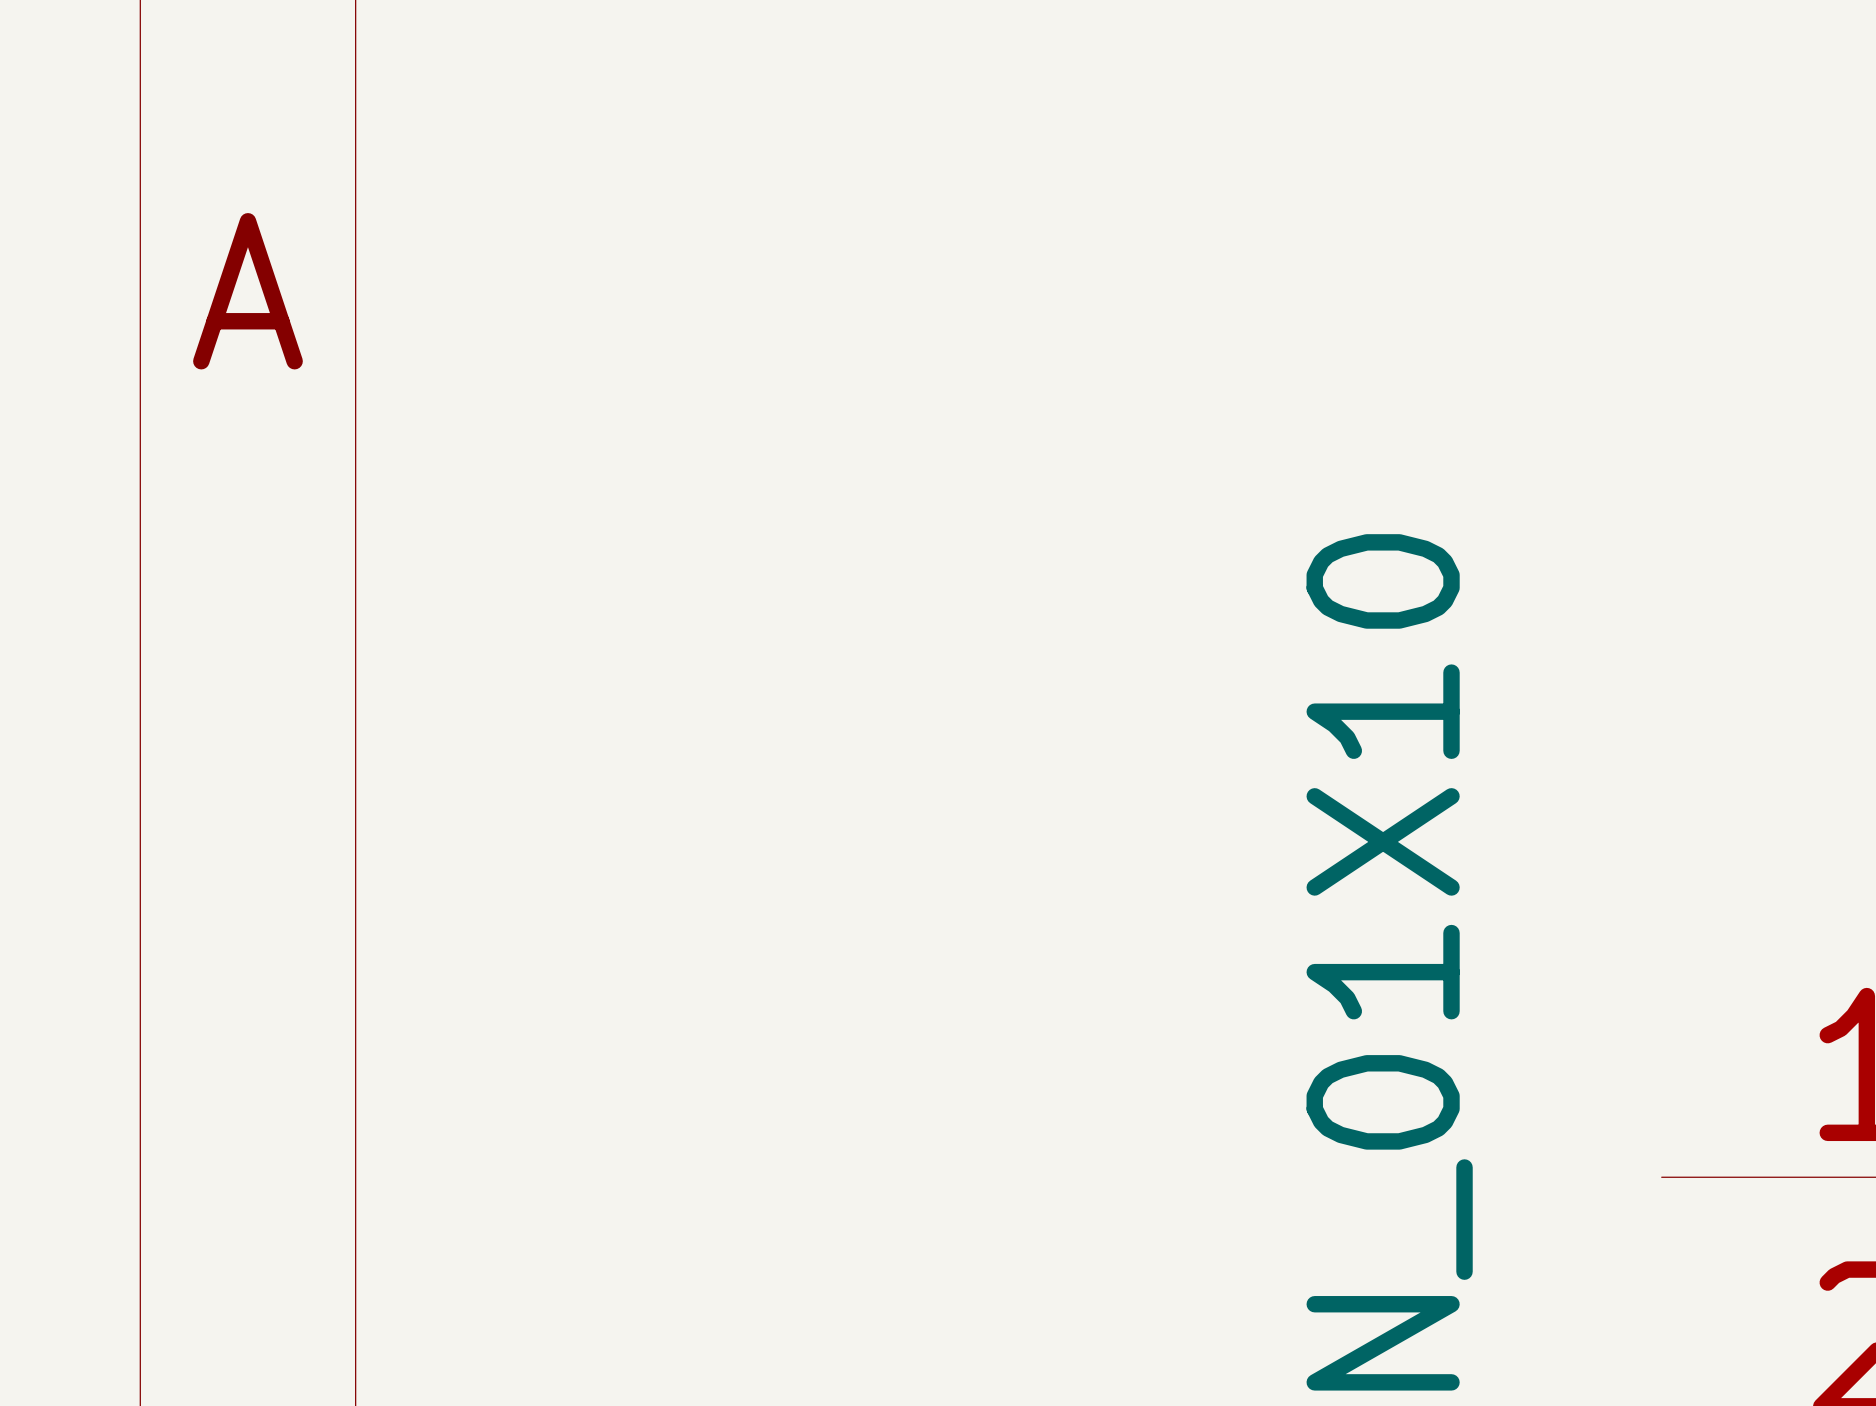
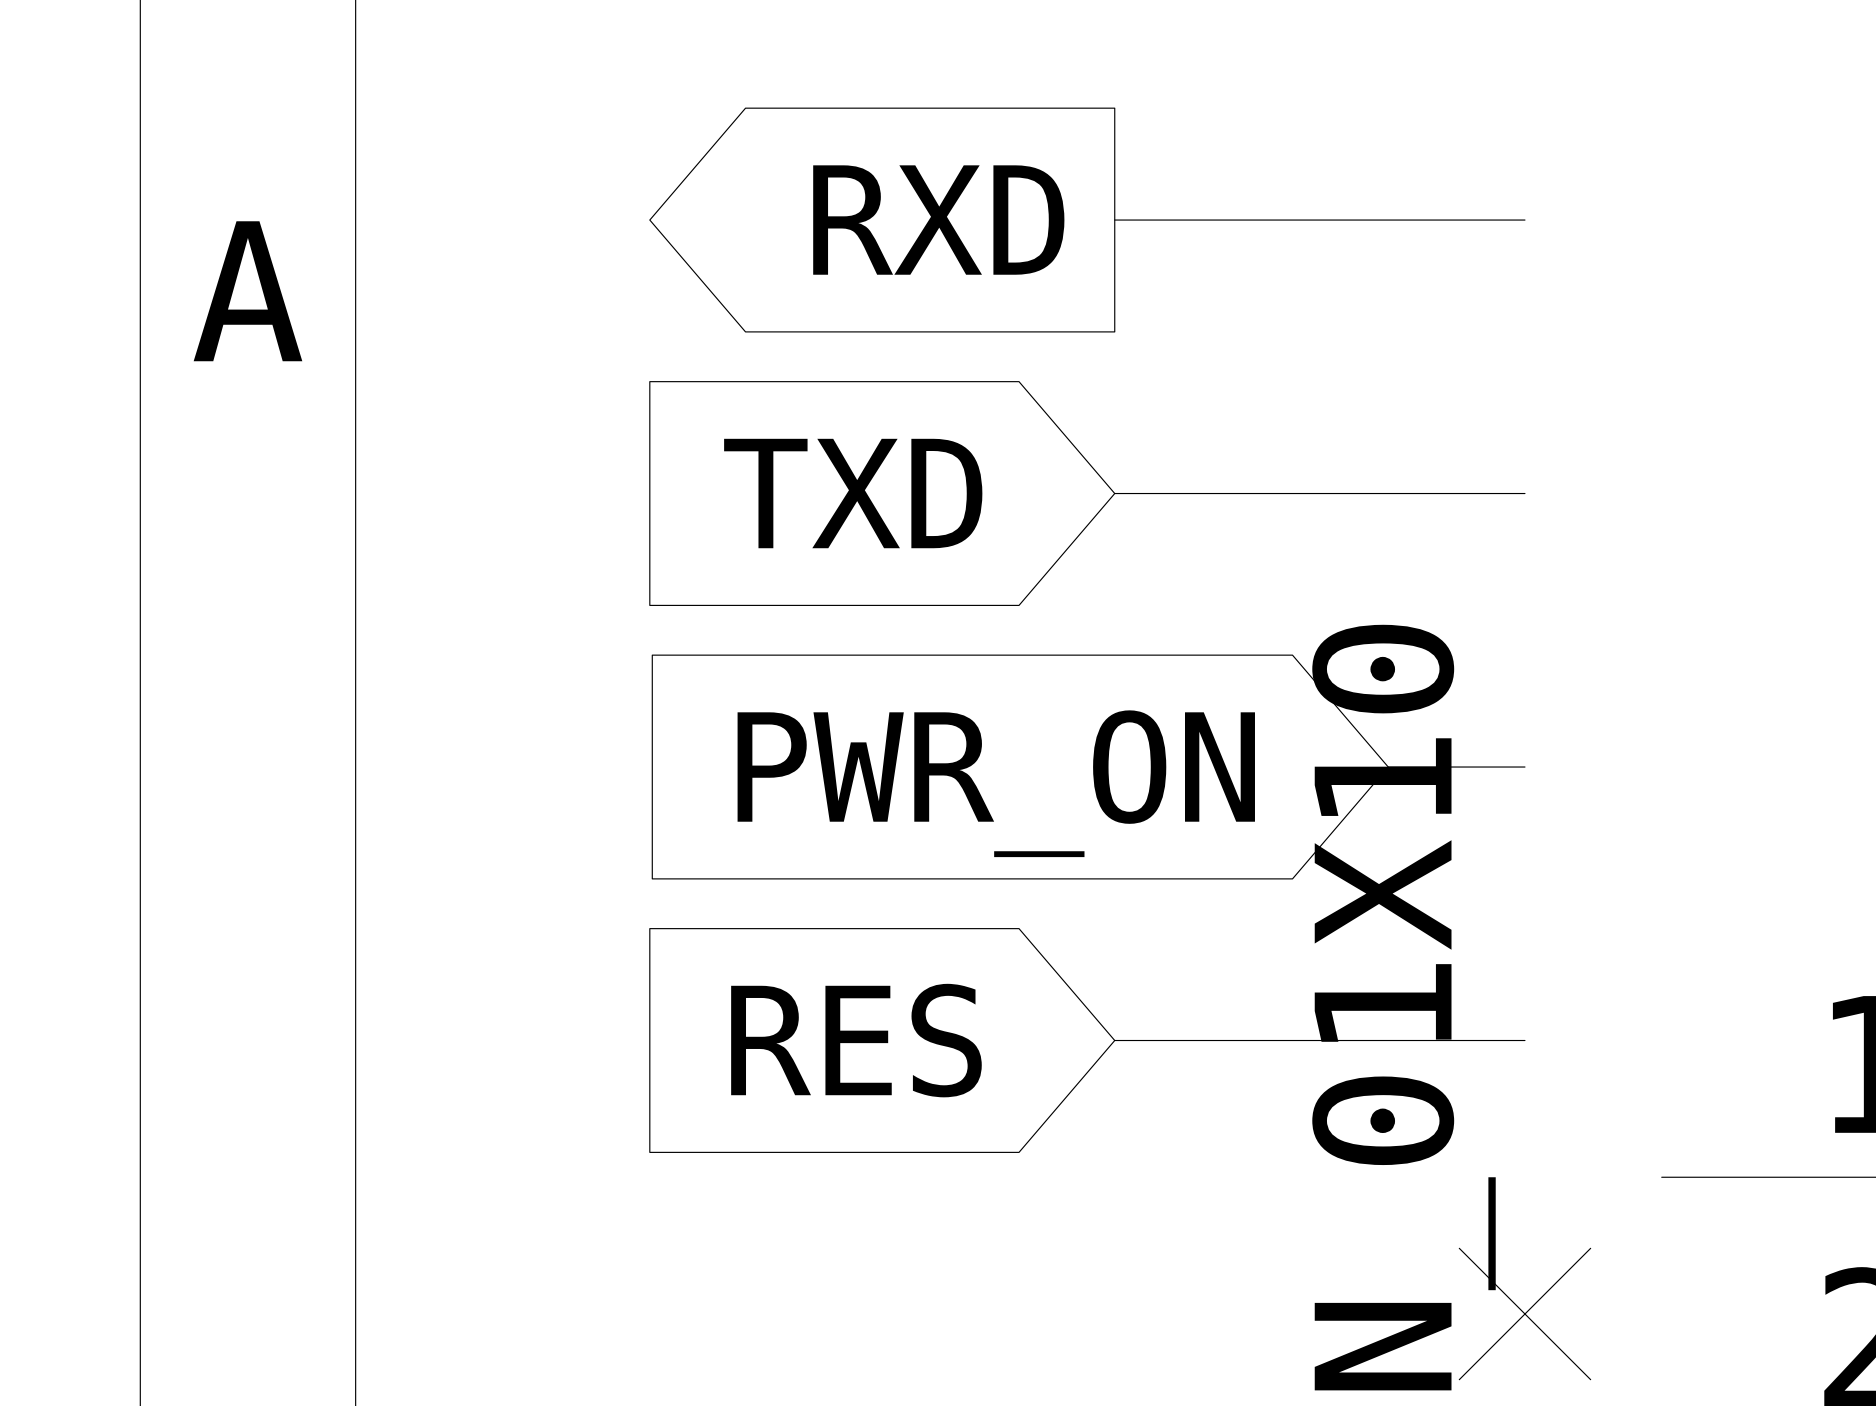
global label: none -> RXD (938, 220)
wire: none -> (1114, 220) (1524, 220)
global label: none -> TXD (853, 493)
wire: none -> (1114, 493) (1524, 493)
wire: none -> (1388, 767) (1524, 767)
global label: none -> PWR_ON (996, 783)
global label: none -> RES (856, 1040)
wire: none -> (1114, 1040) (1524, 1040)
no-connect mark: none -> (1524, 1313)

